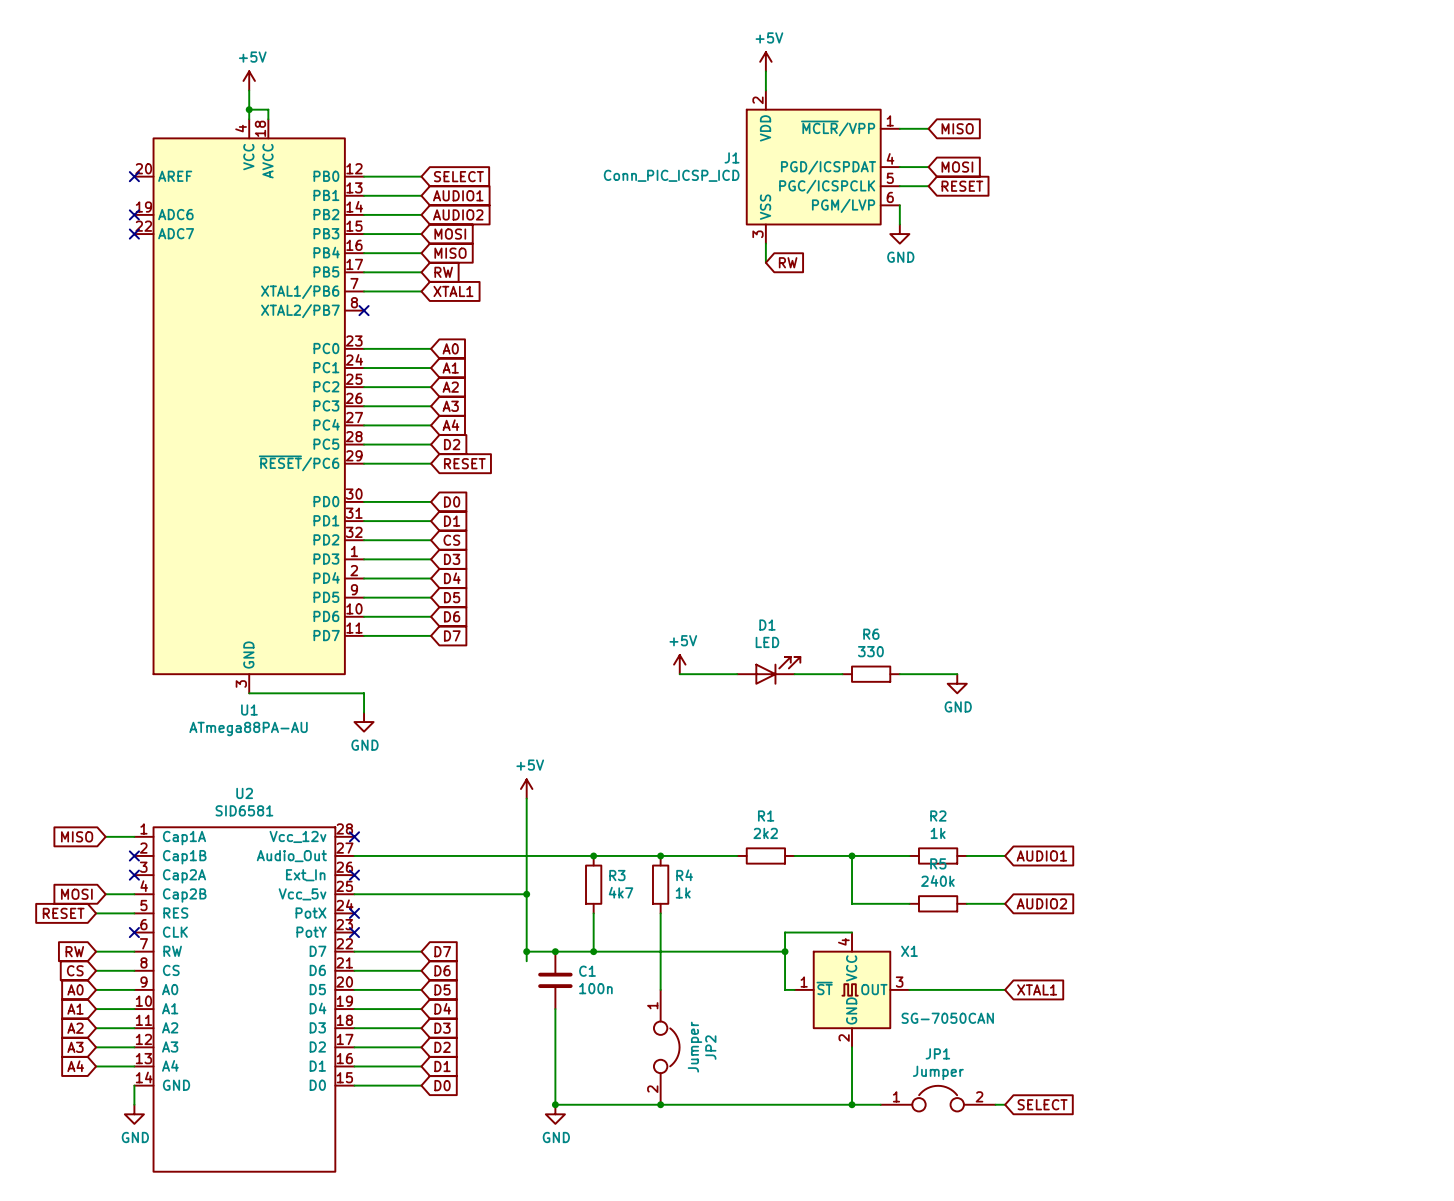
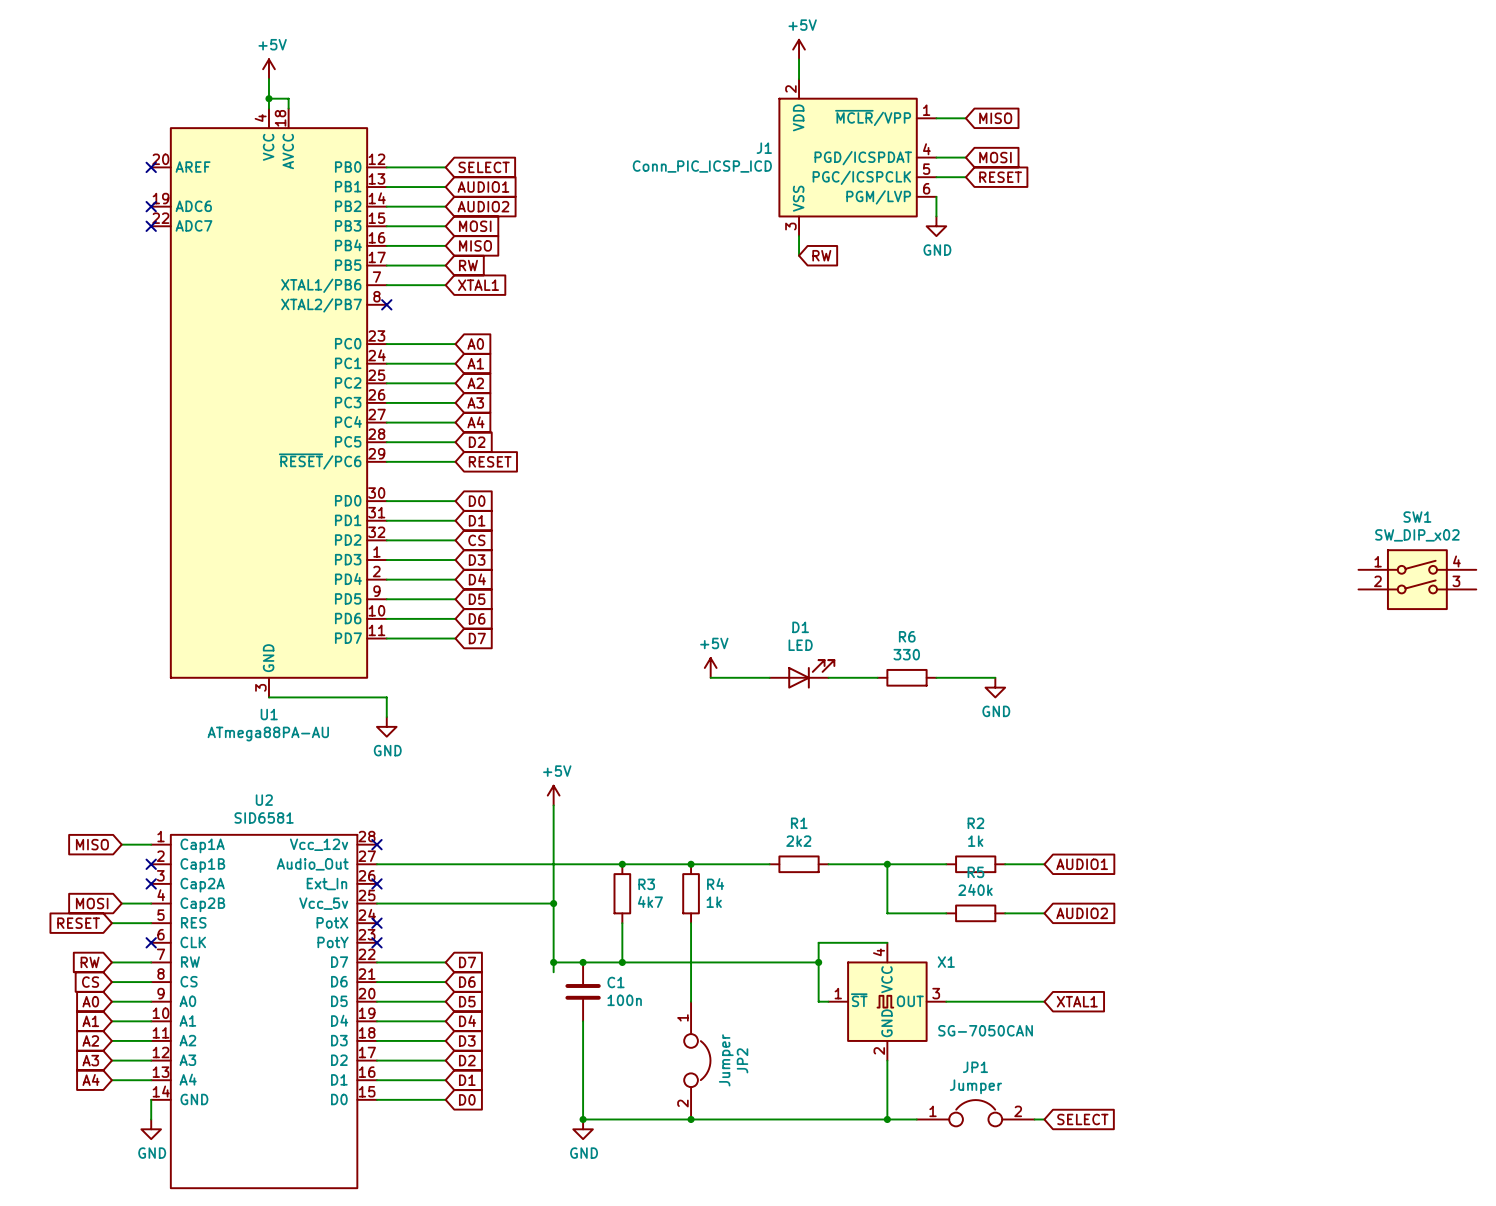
SW1: none -> SW_DIP_x02 (1417, 579)

